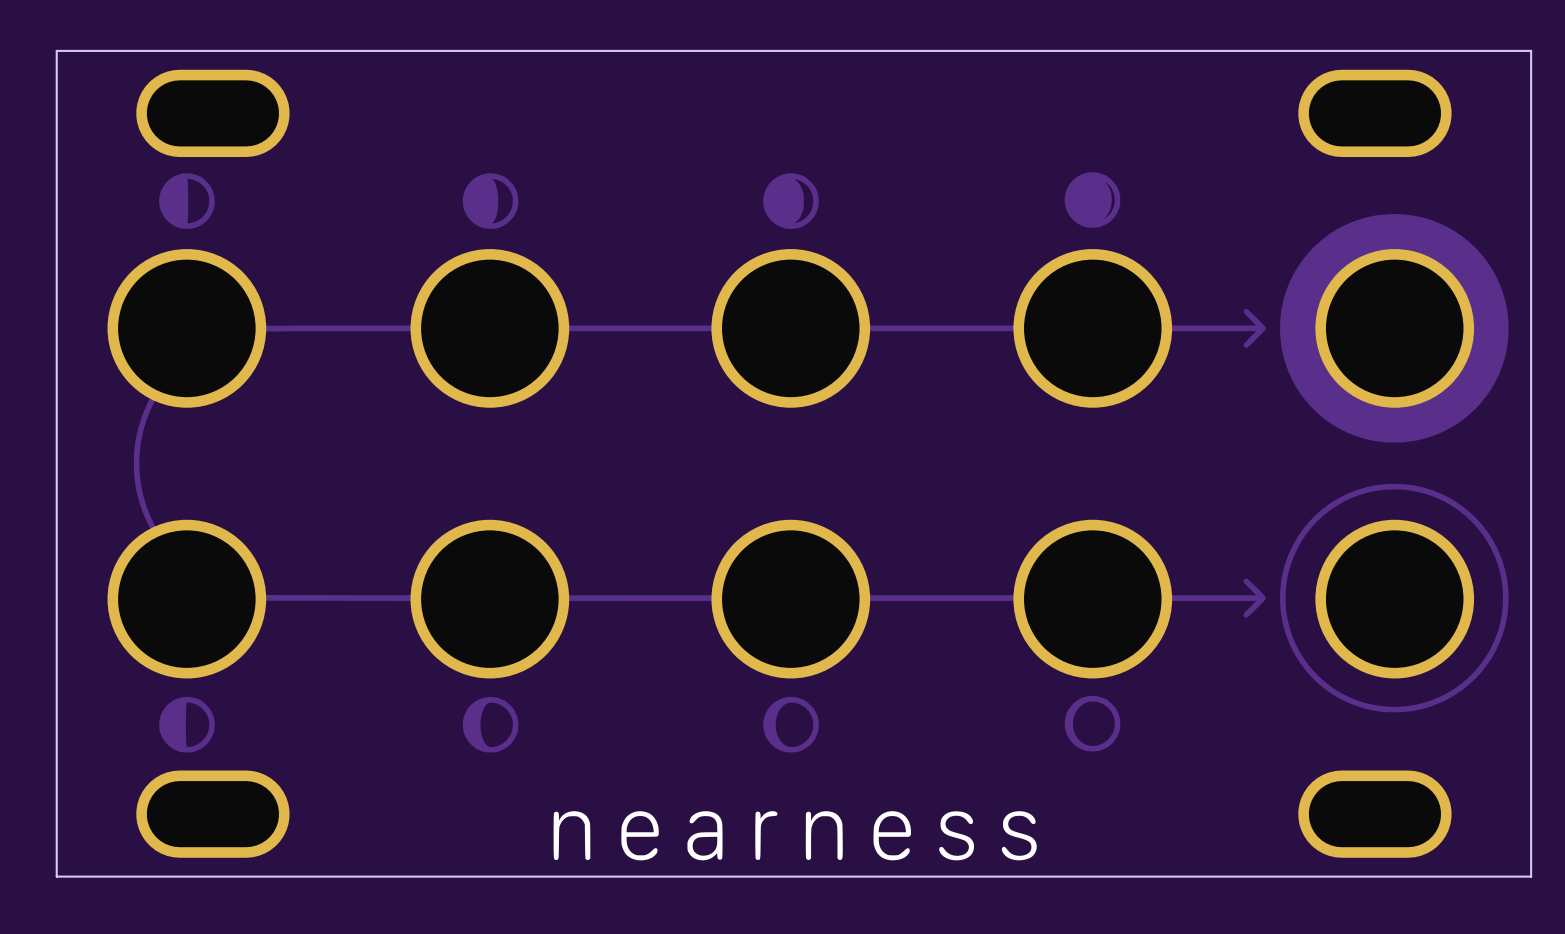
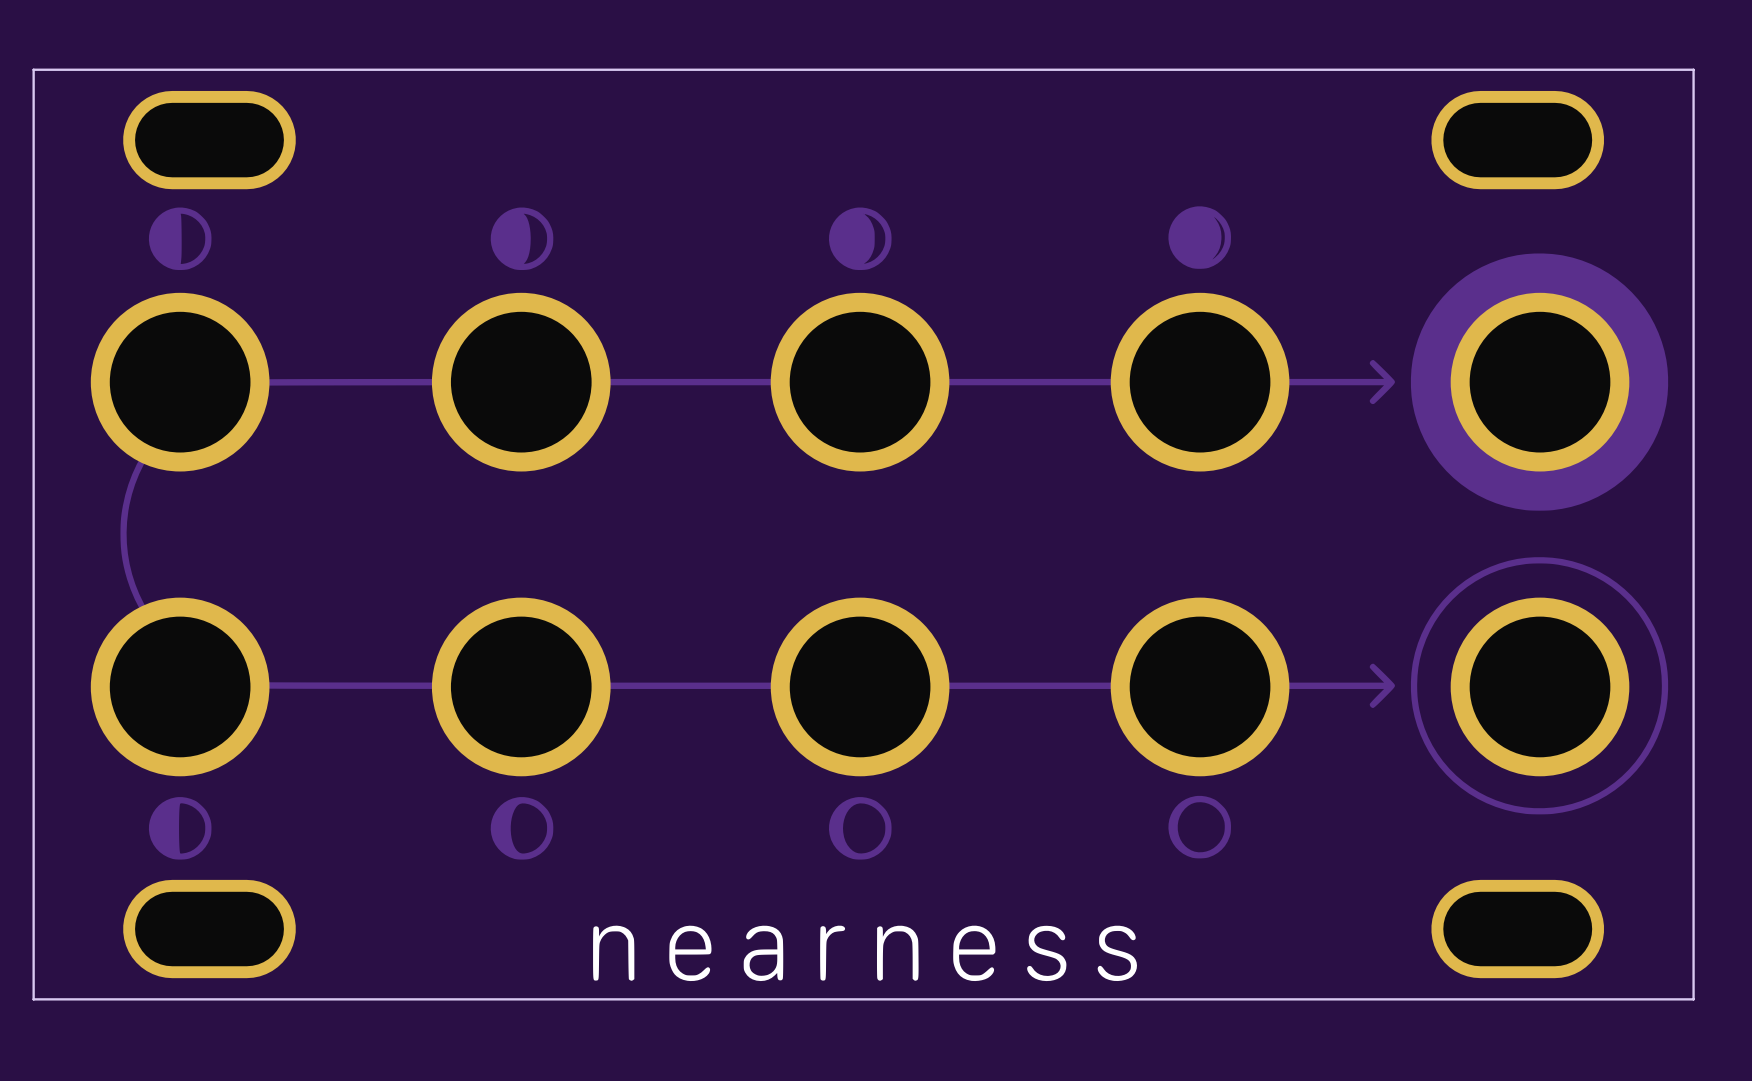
part footprint: [107, 249, 267, 408] -> [90, 292, 270, 472]
part footprint: [410, 249, 570, 408] -> [431, 292, 611, 472]
part footprint: [711, 249, 871, 408] -> [770, 292, 950, 472]
part footprint: [1013, 249, 1173, 408] -> [1110, 292, 1290, 472]
part footprint: [1315, 249, 1475, 408] -> [1450, 292, 1630, 472]
part footprint: [107, 519, 267, 679] -> [90, 597, 270, 777]
part footprint: [410, 519, 570, 679] -> [431, 597, 611, 777]
part footprint: [711, 519, 871, 679] -> [770, 597, 950, 777]
part footprint: [1013, 519, 1173, 679] -> [1110, 597, 1290, 777]
part footprint: [1315, 519, 1475, 679] -> [1450, 597, 1630, 777]

